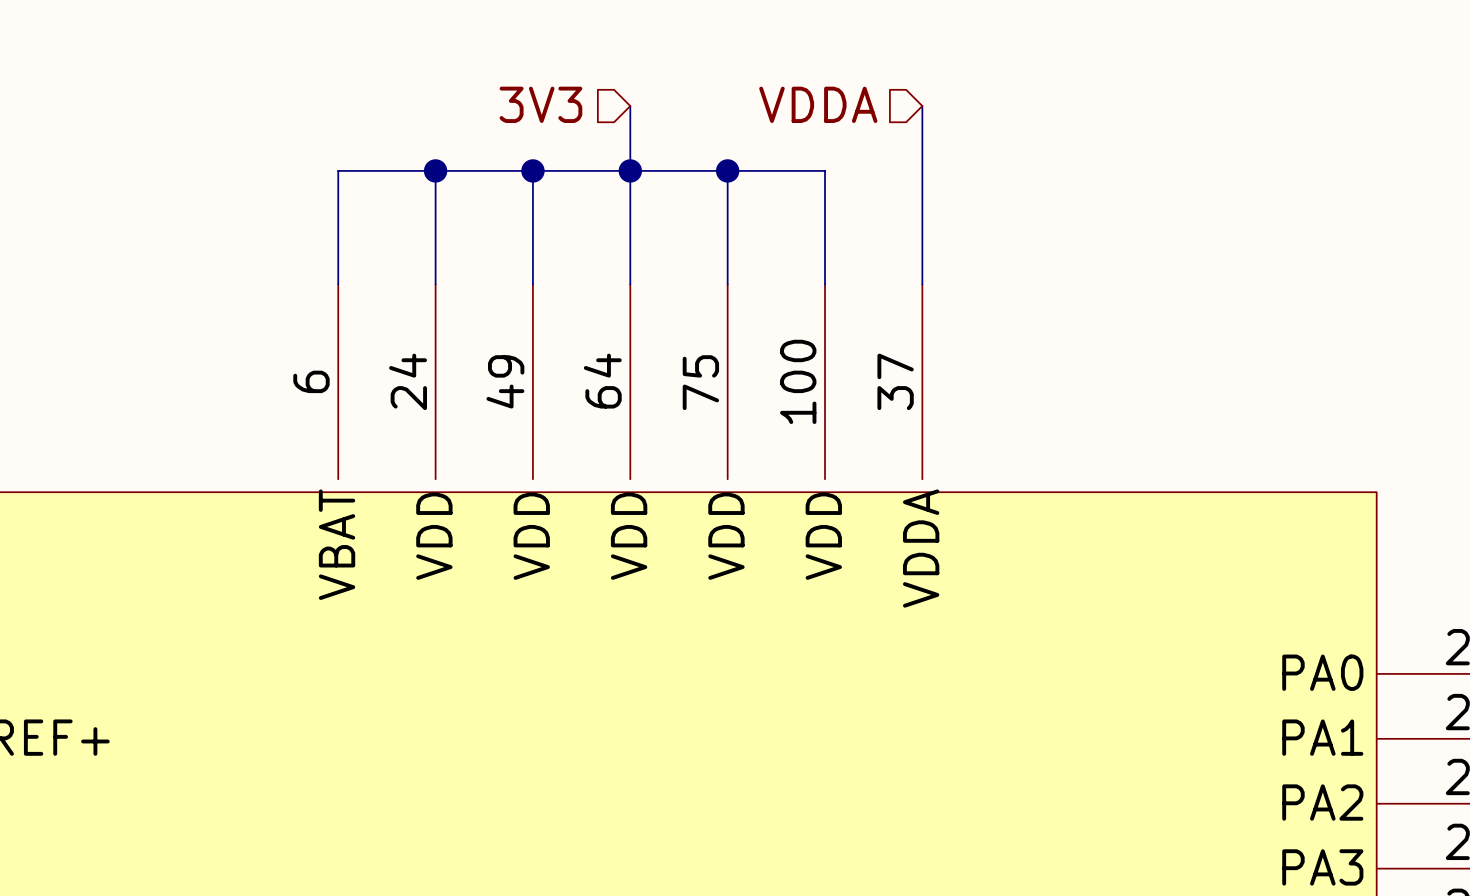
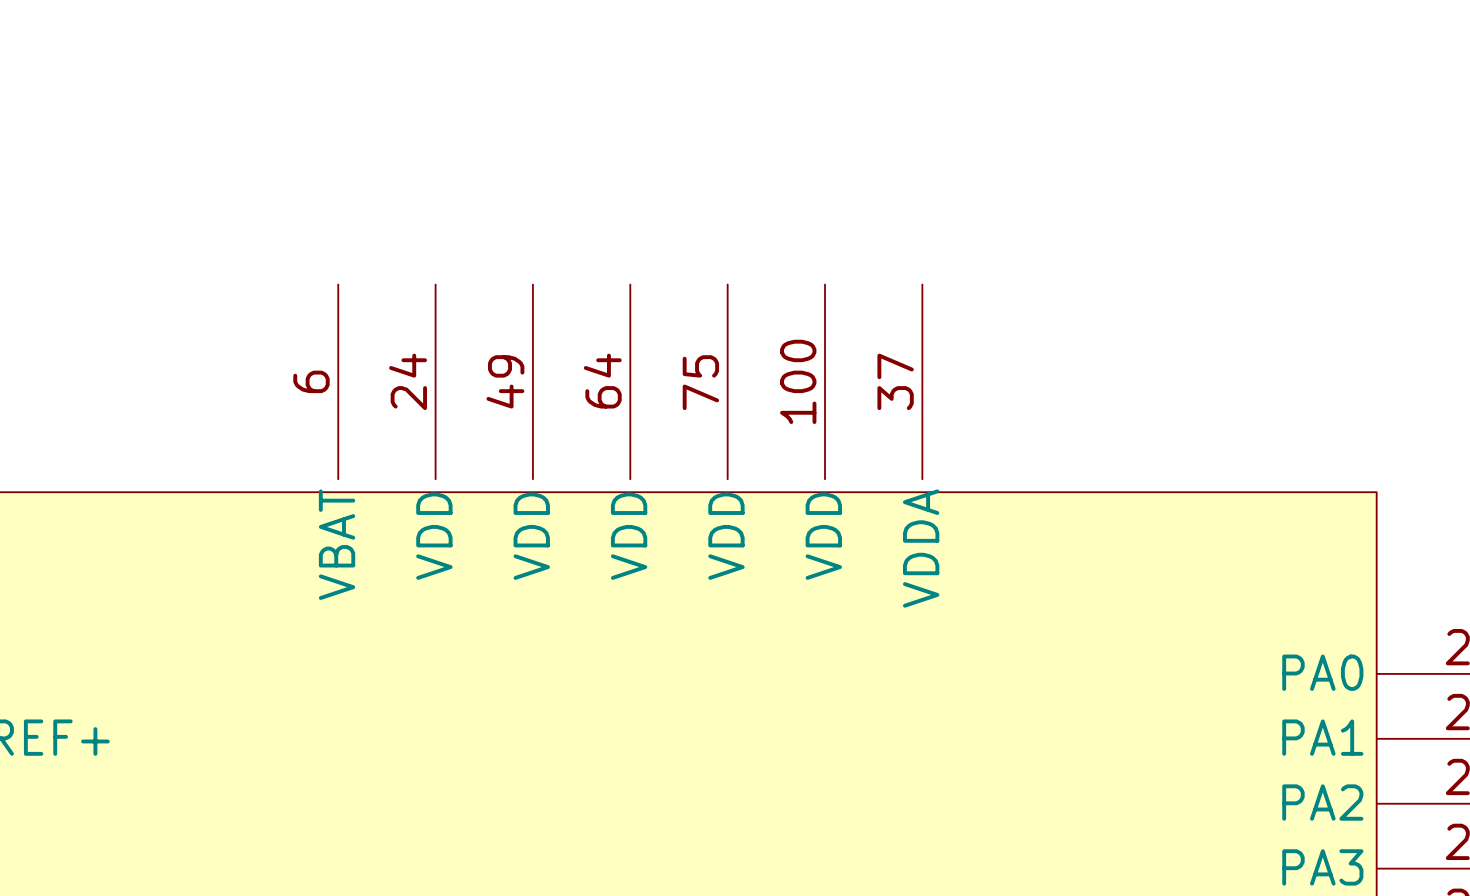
hierarchical label: 3V3 (540, 104) -> none
hierarchical label: VDDA (818, 104) -> none
wire: (630, 106) (630, 284) -> none
wire: (922, 106) (922, 284) -> none
wire: (435, 170) (435, 284) -> none
junction: (435, 170) -> none
wire: (532, 170) (532, 284) -> none
junction: (532, 170) -> none
junction: (630, 170) -> none
wire: (727, 170) (727, 284) -> none
junction: (727, 170) -> none
wire: (338, 284) (338, 170) (825, 170) (825, 284) -> none

